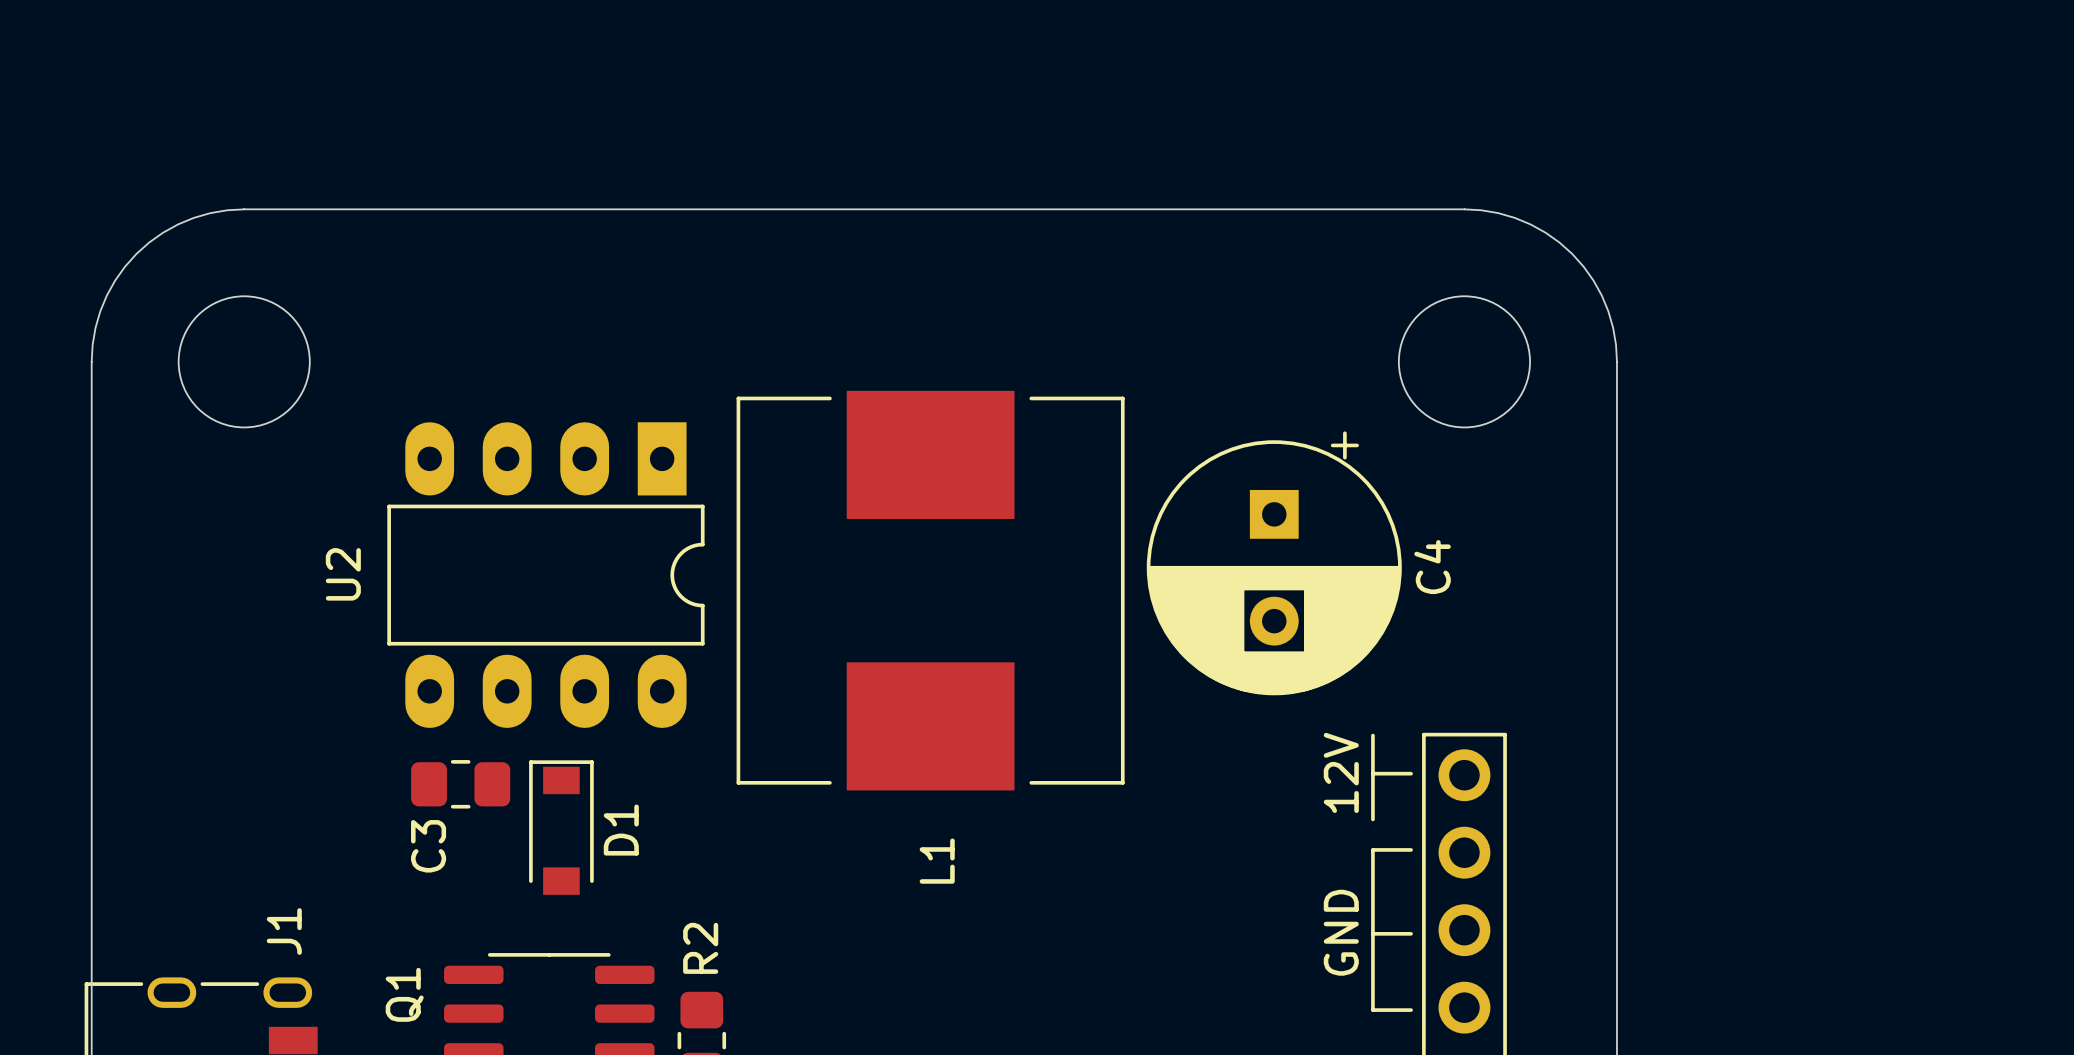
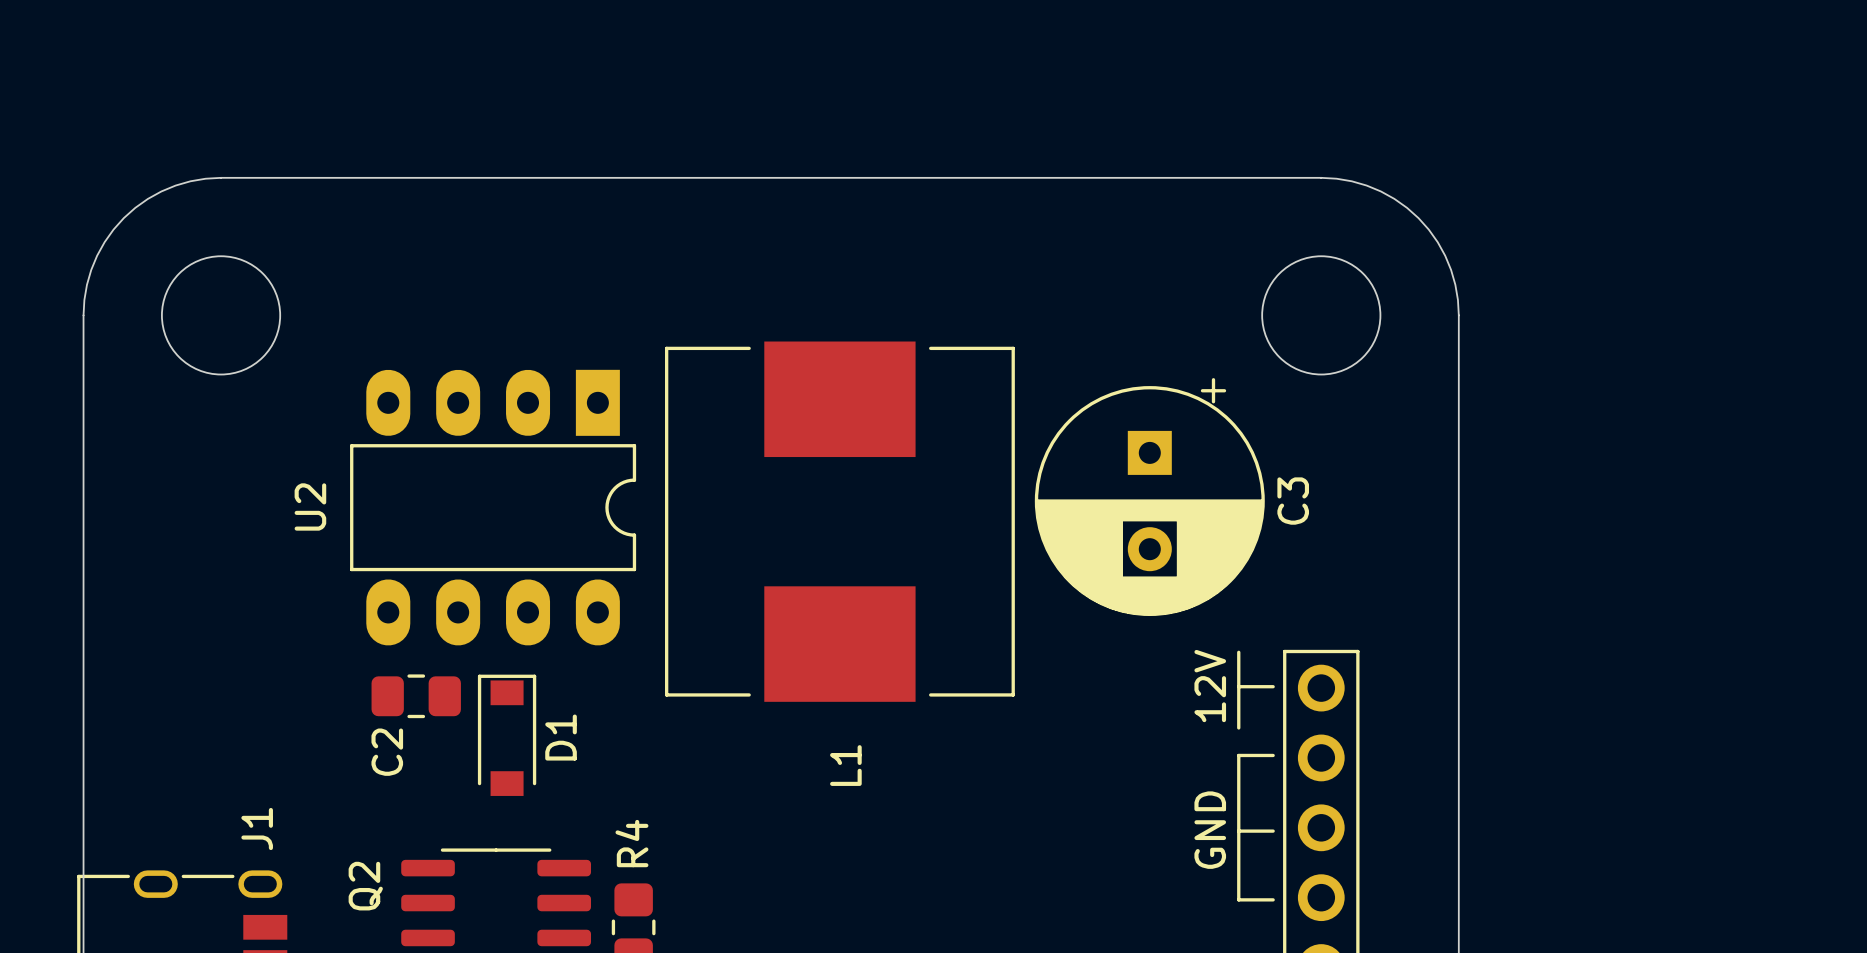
C4 name: C4 (1432, 567) -> C3 (1293, 501)
C3 name: C3 (428, 846) -> C2 (387, 752)
R2 name: R2 (700, 948) -> R4 (631, 843)
Q1 name: Q1 (404, 994) -> Q2 (365, 886)

